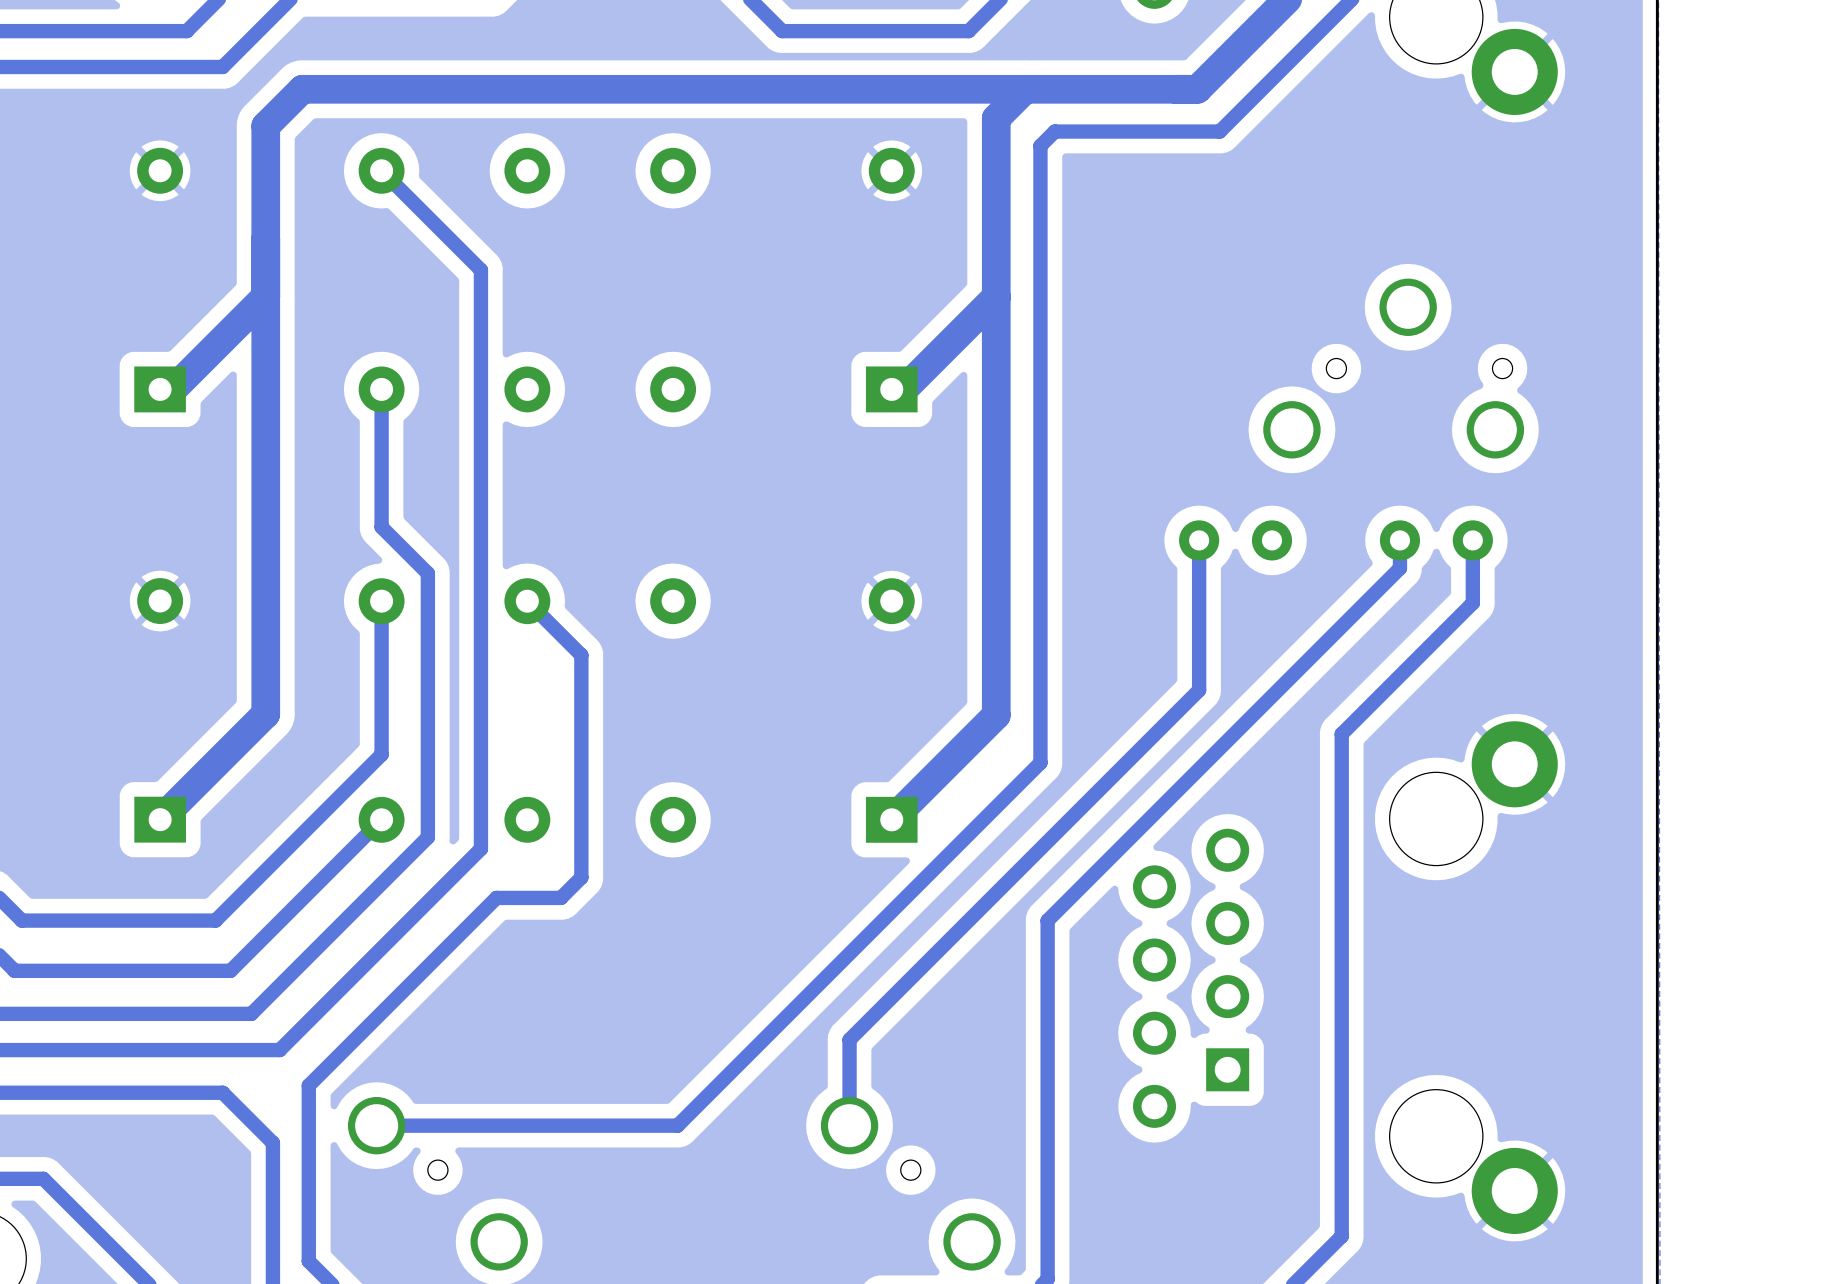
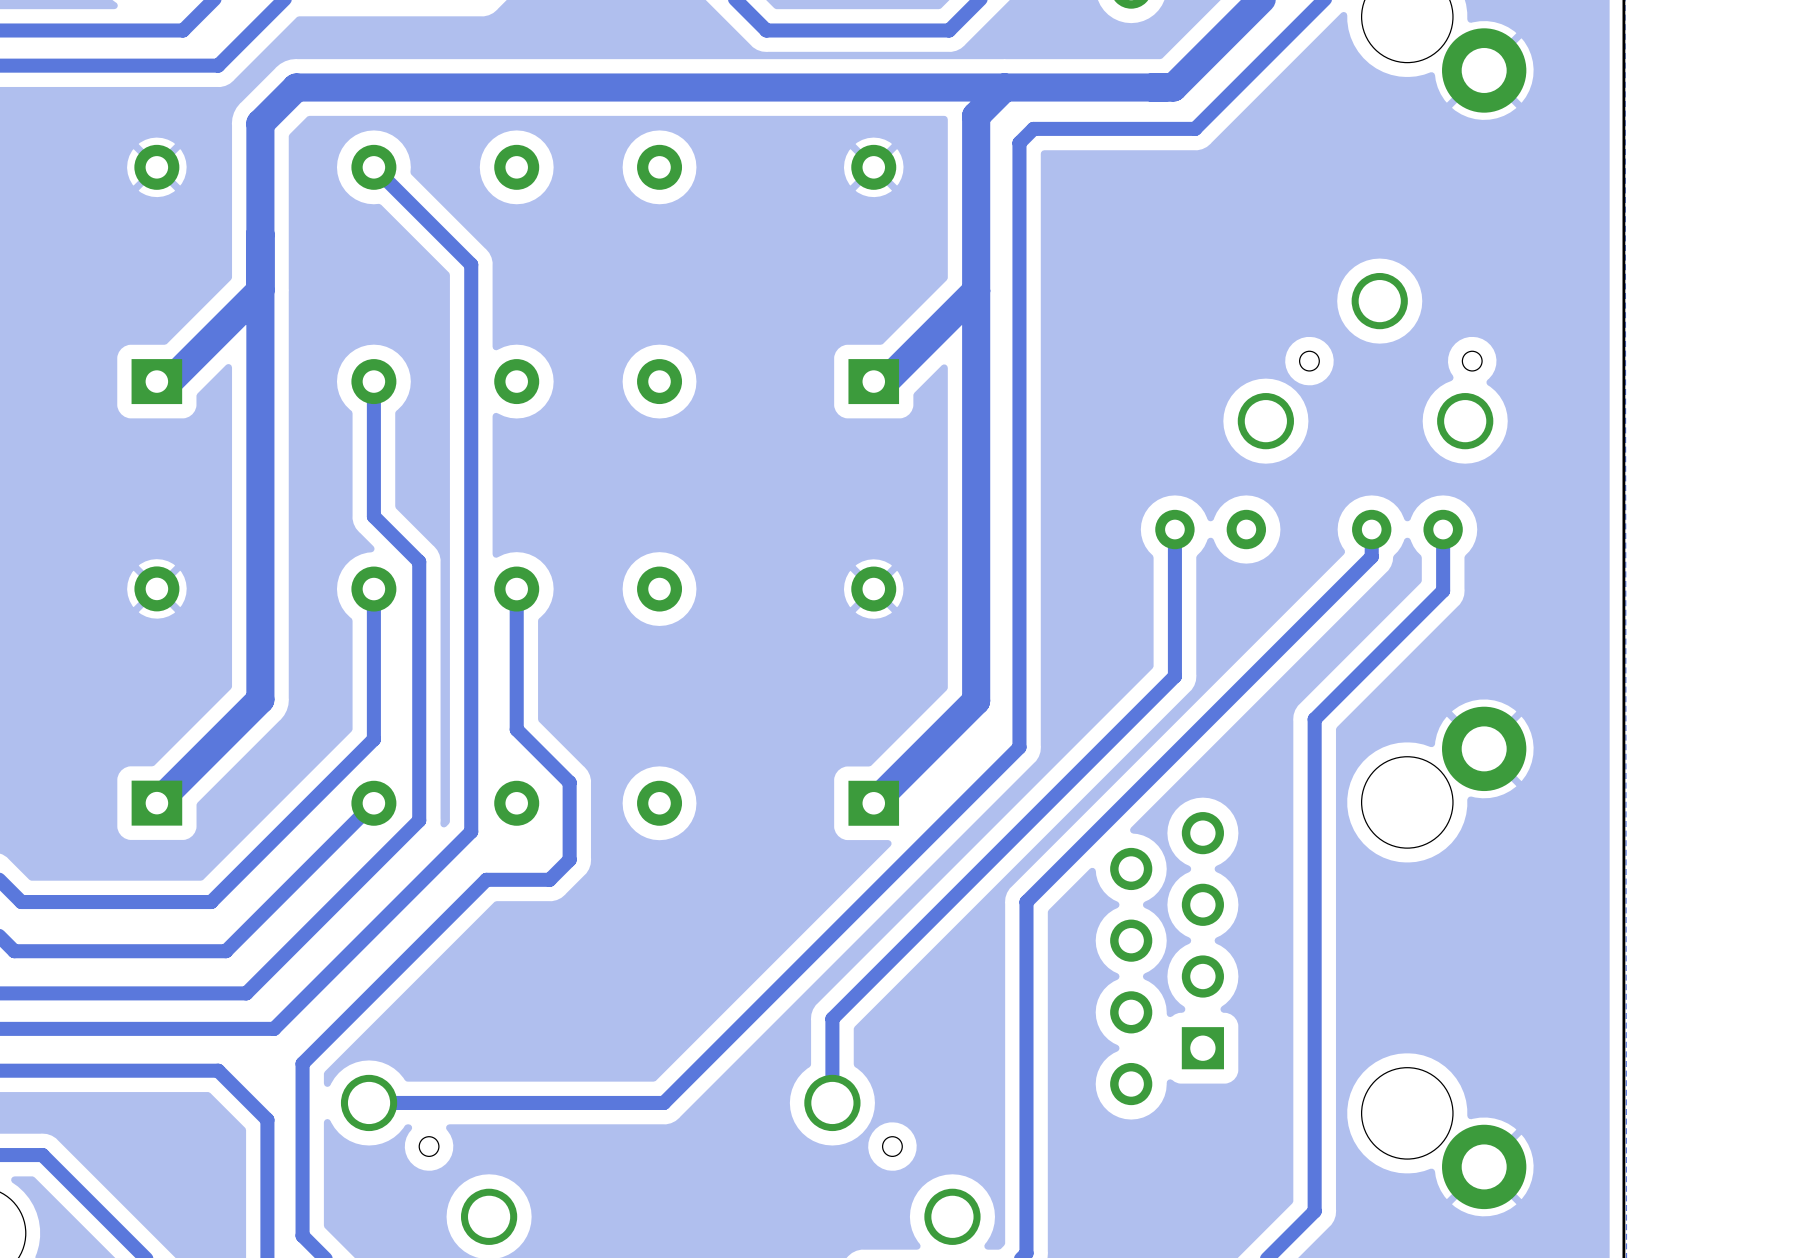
track: (527, 601) (581, 655) (581, 798) -> (516, 589) (516, 729) (569, 782)

